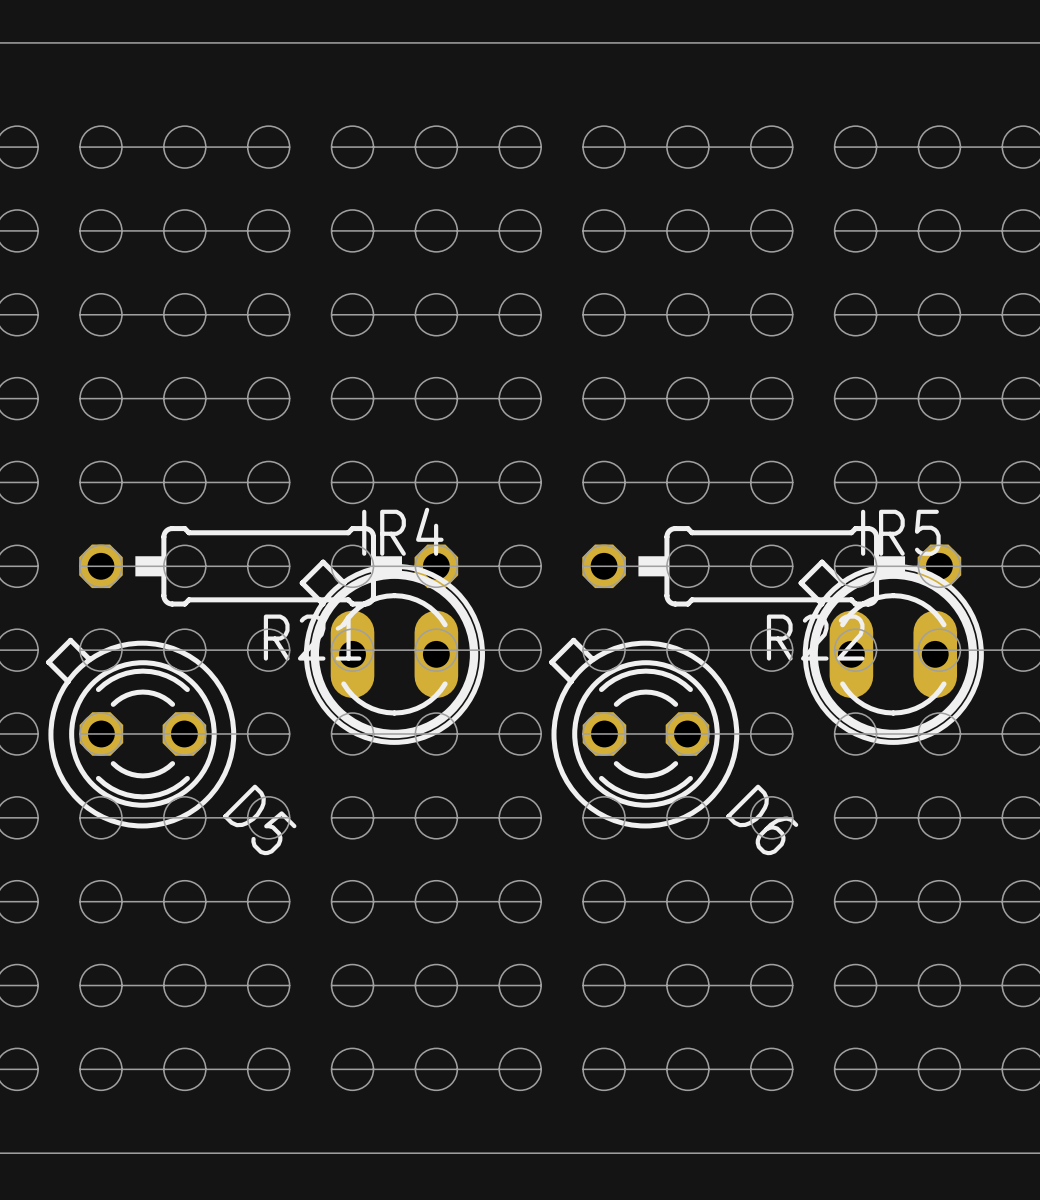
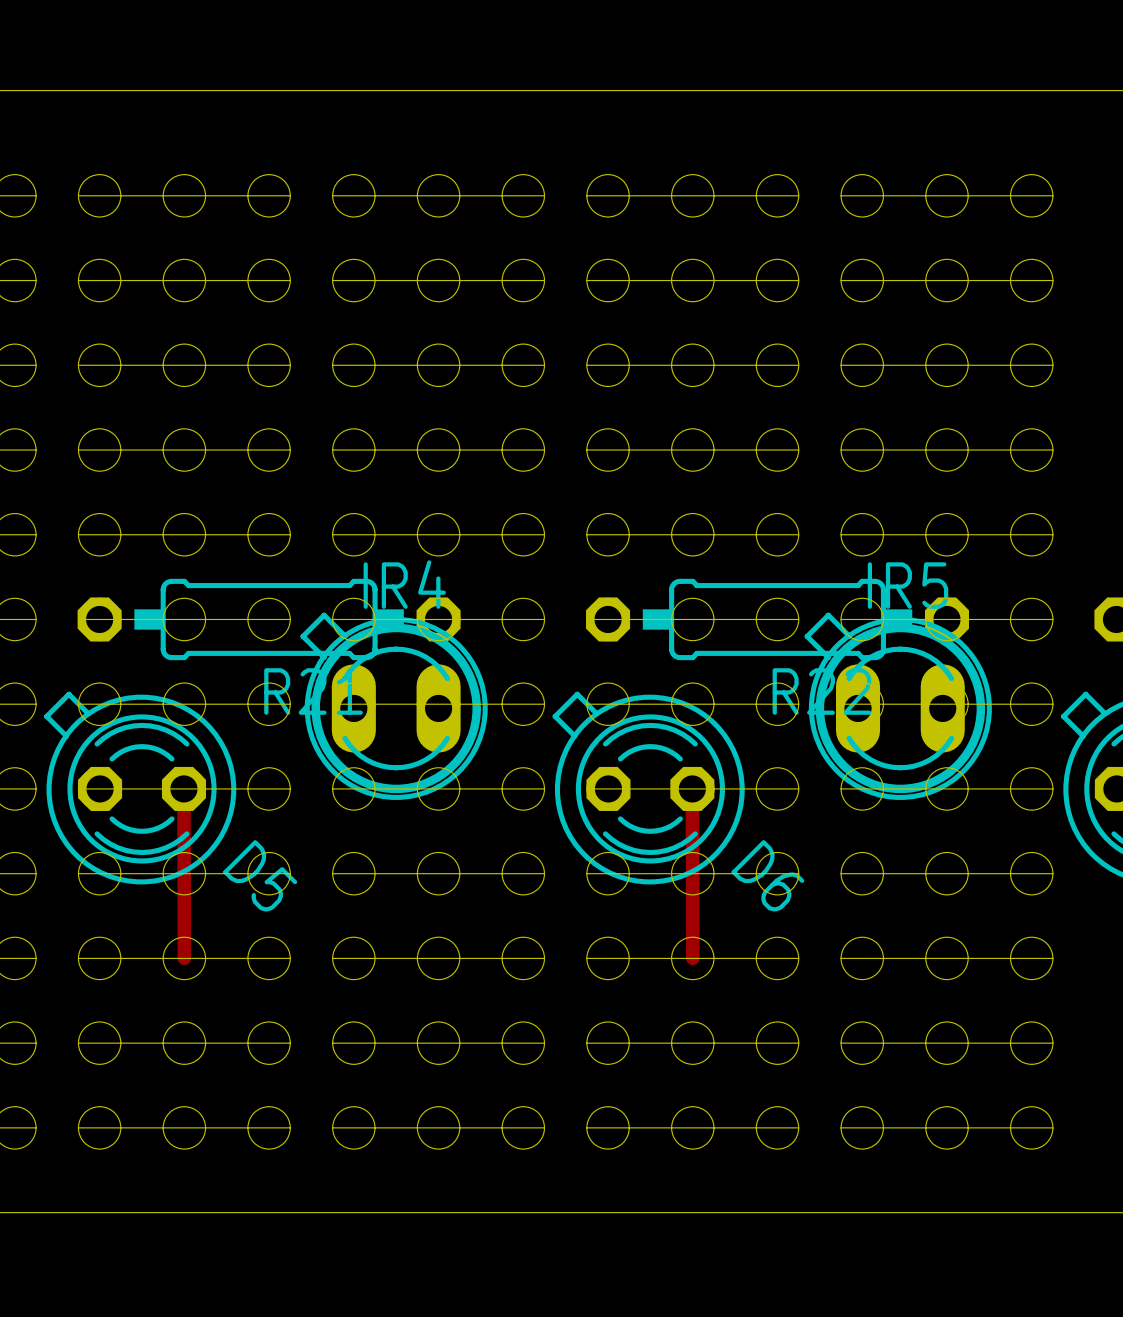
track: none -> (183, 788) (184, 958)
track: none -> (692, 788) (692, 958)

